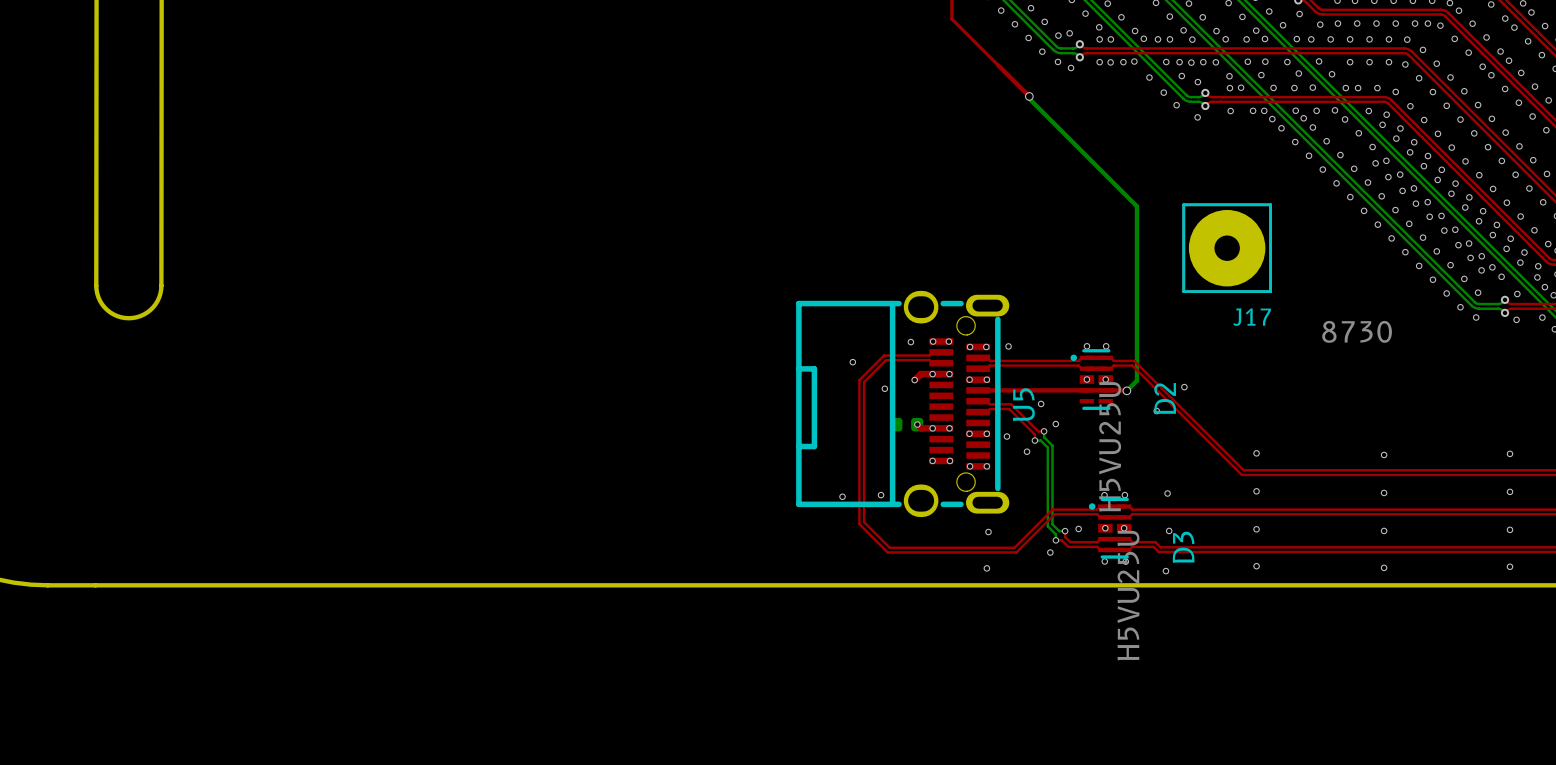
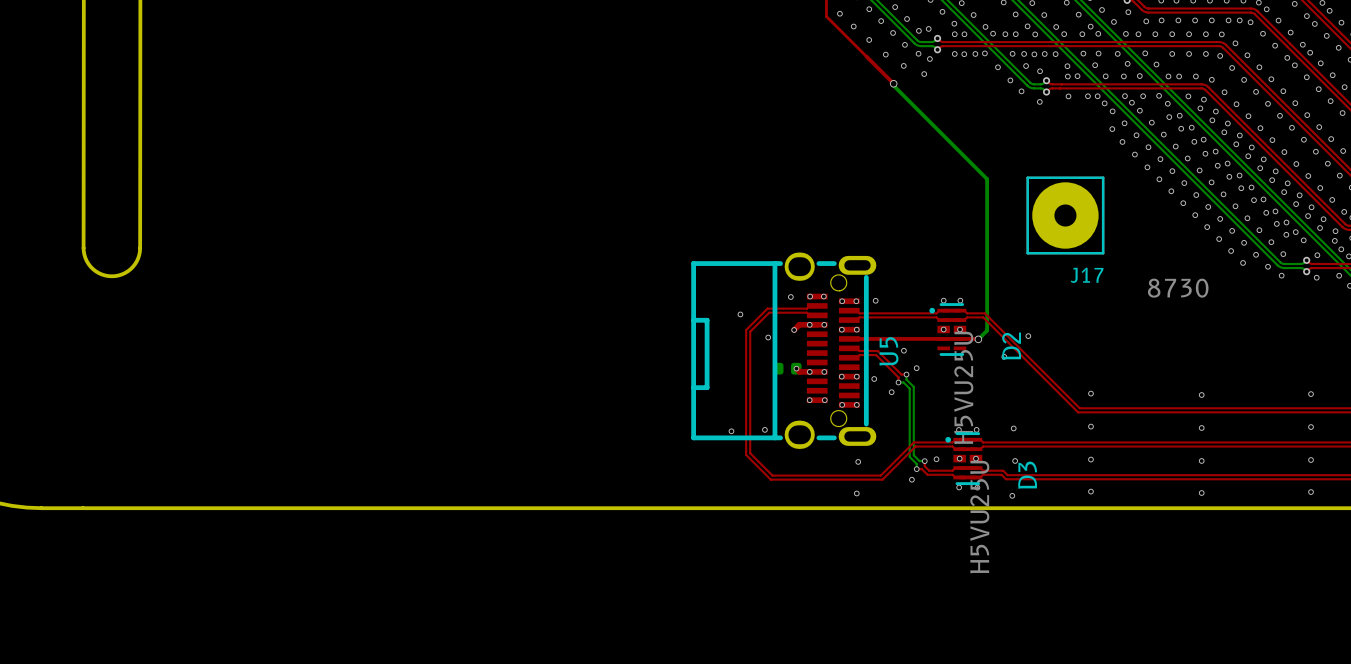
via: none -> (839, 13)
via: none -> (853, 26)
via: none -> (869, 39)
via: none -> (885, 54)
via: none -> (903, 65)
via: none -> (924, 74)
via: none -> (1169, 117)
via: none -> (1112, 129)
via: none -> (1181, 128)
via: none -> (1122, 141)
via: none -> (1134, 154)
via: none -> (1147, 167)
via: none -> (1159, 179)
via: none -> (1171, 191)
via: none -> (1183, 203)
via: none -> (1195, 215)
via: none -> (1207, 227)
via: none -> (1219, 239)
via: none -> (1231, 251)
via: none -> (1243, 262)

